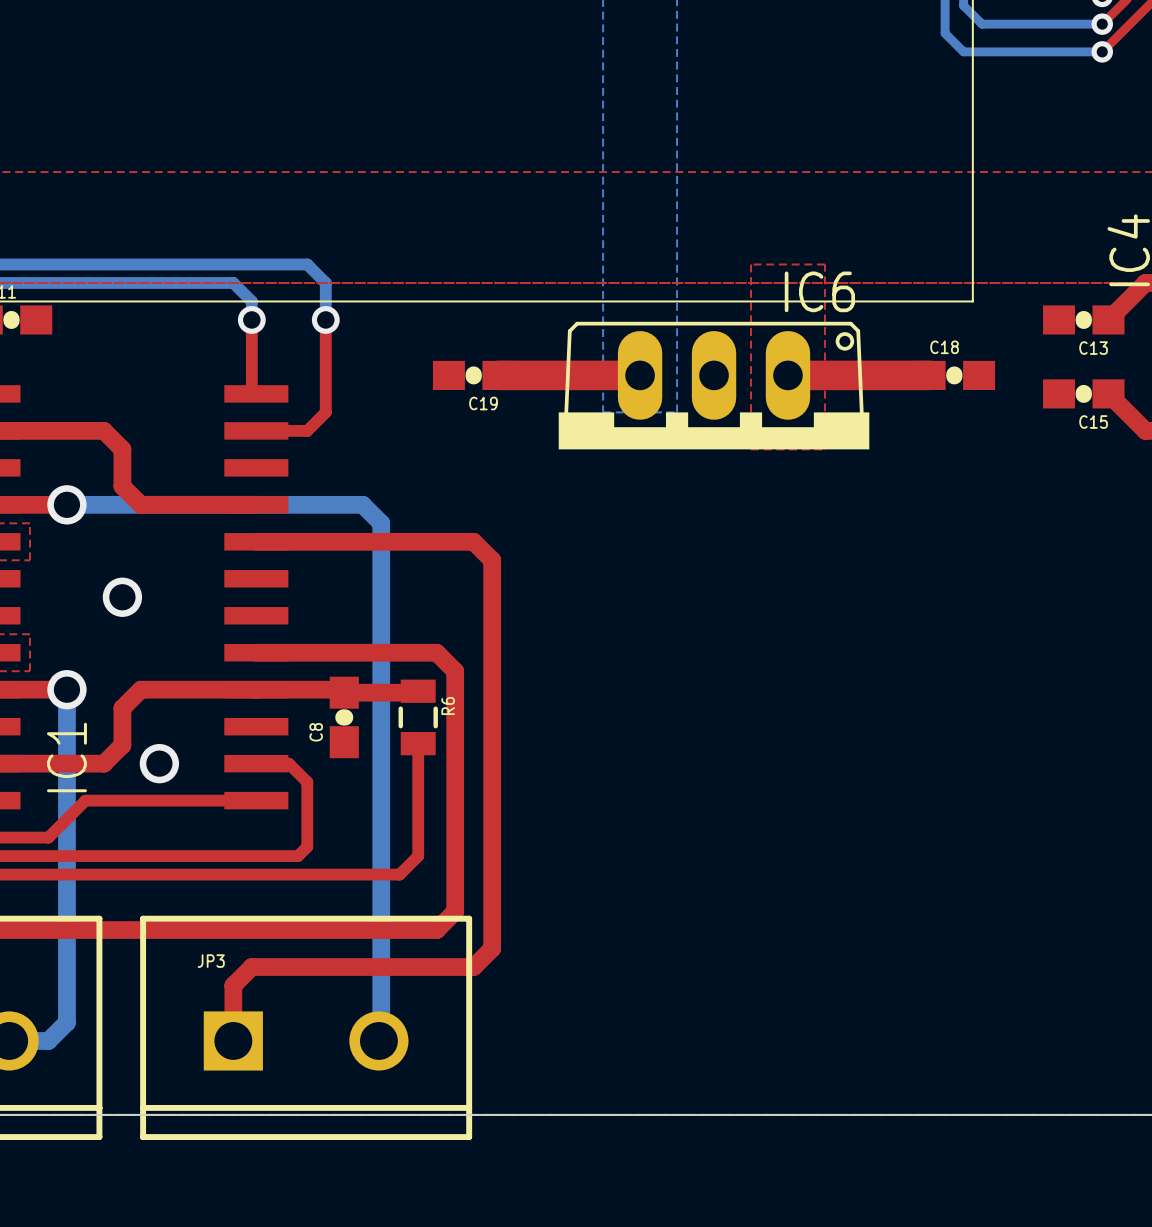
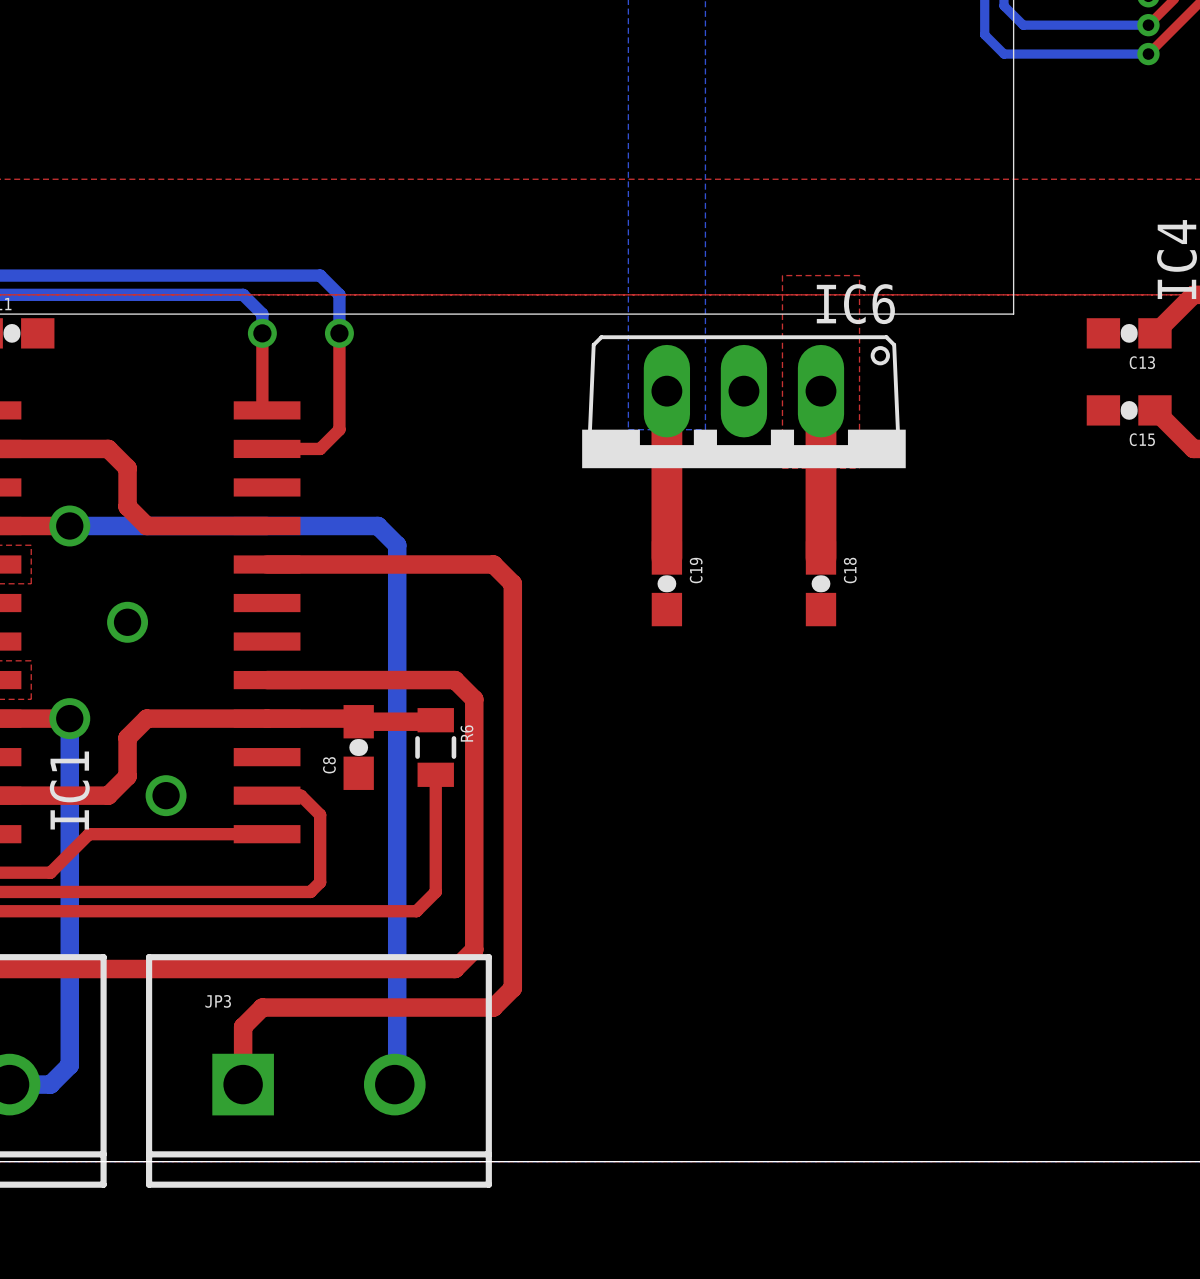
C19 rotation: 0° (473, 375) -> 90° clockwise (666, 583)
C19 position: (473, 375) -> (666, 583)
top track: (498, 375) (640, 375) -> (666, 557) (666, 391)
top track: (787, 375) (929, 375) -> (820, 391) (820, 557)
C18 rotation: 0° (954, 375) -> 90° clockwise (820, 583)
C18 position: (954, 375) -> (820, 583)

